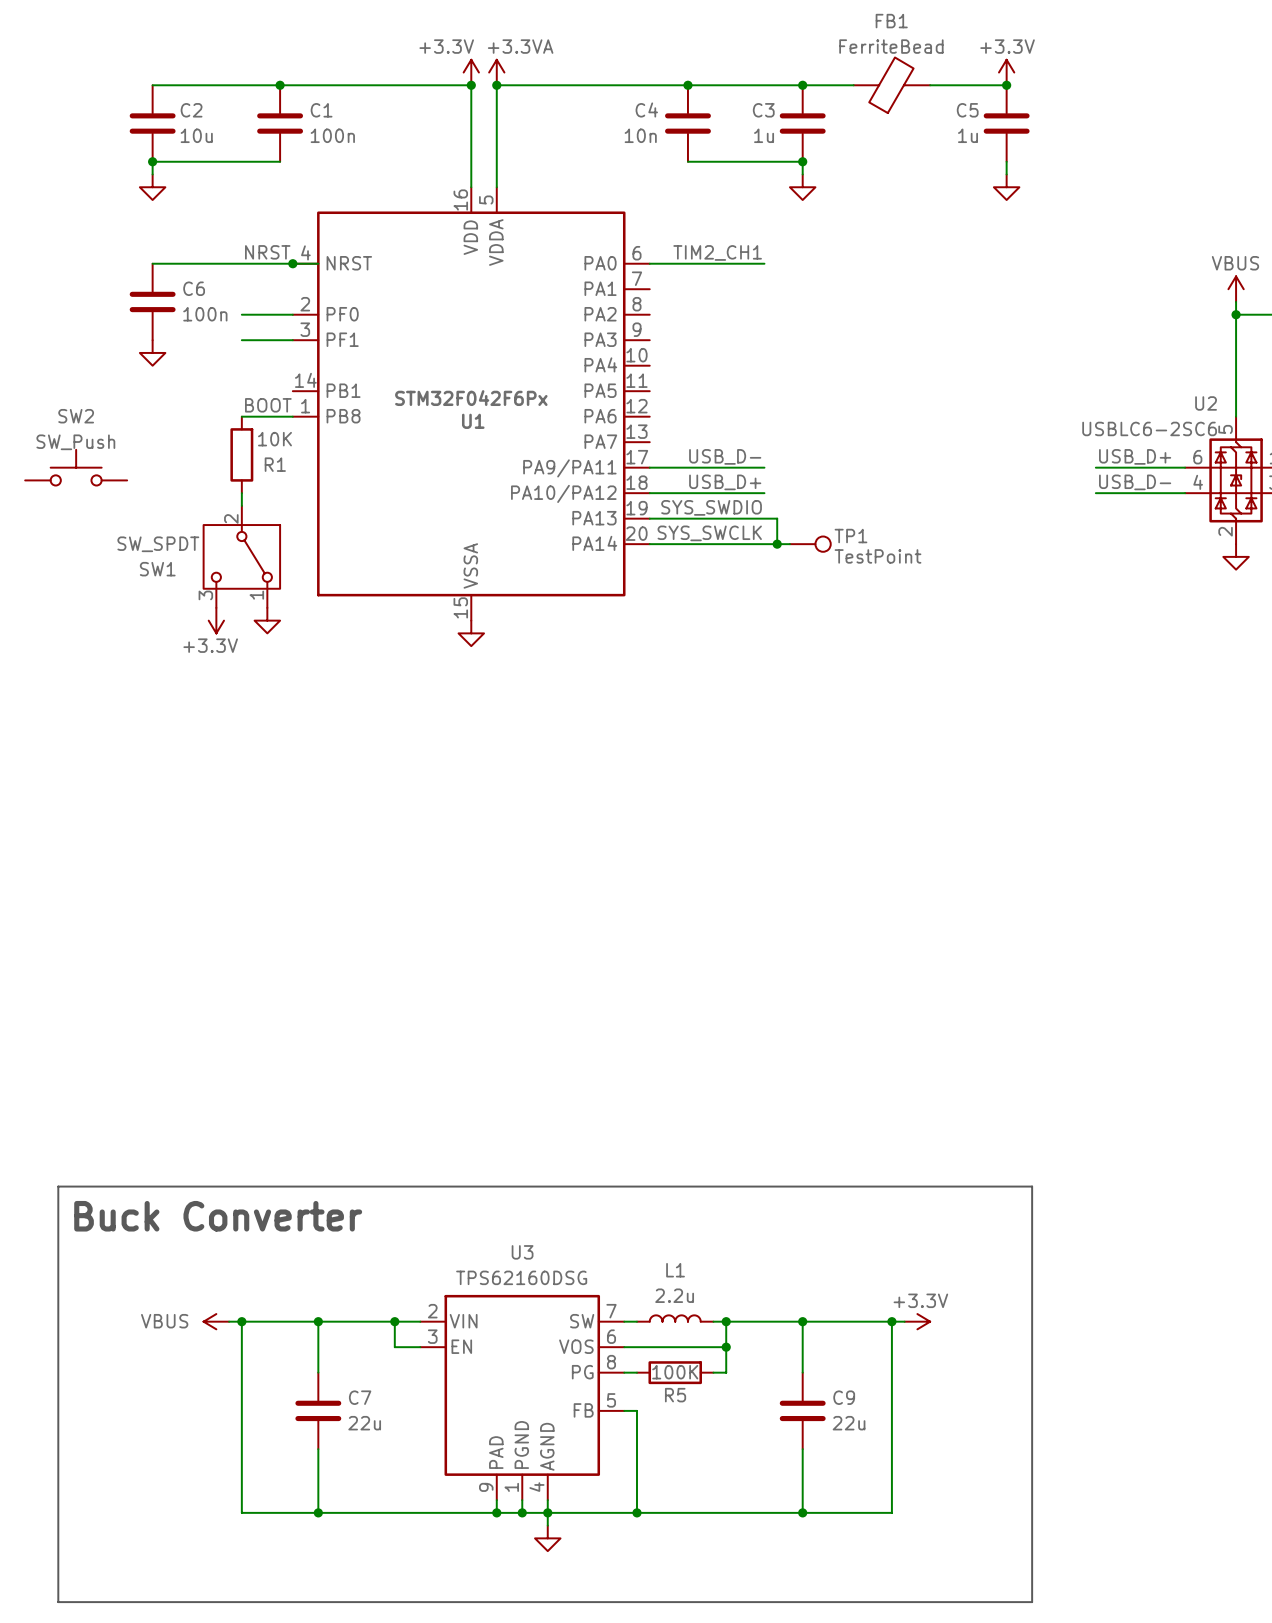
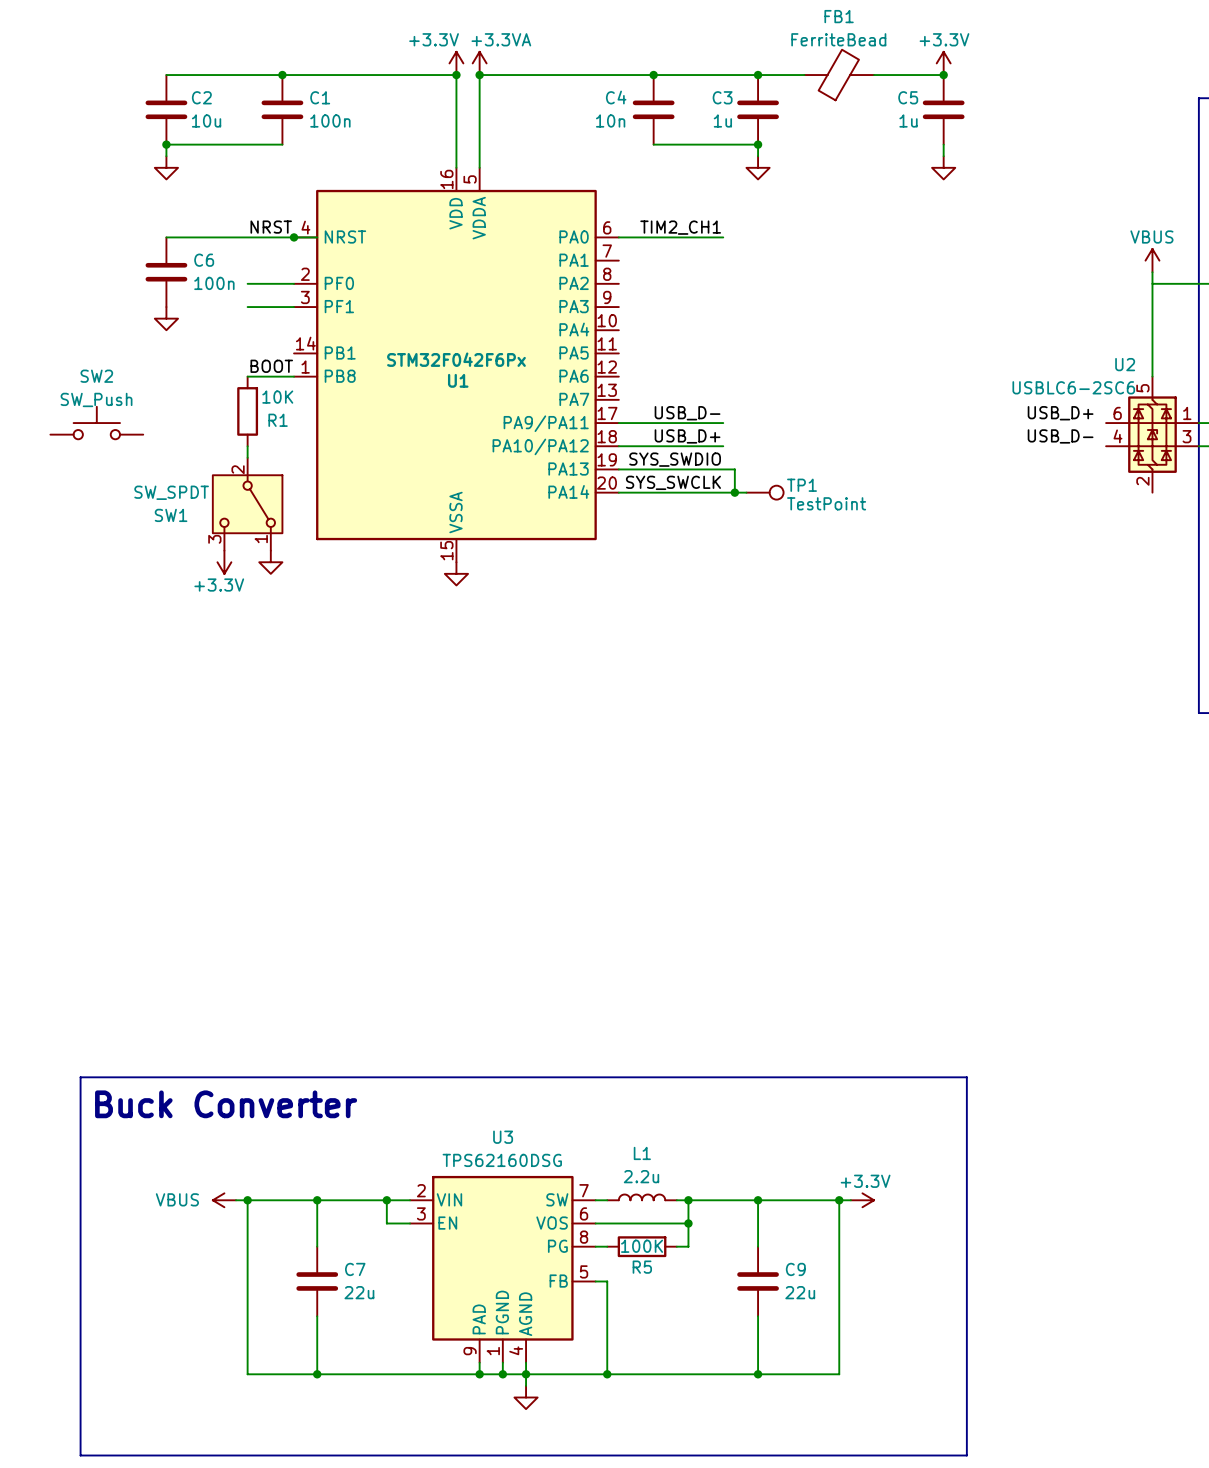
junction: (1236, 314) -> none
wire: (1095, 467) (1185, 467) -> none
wire: (1095, 493) (1185, 493) -> none
power symbol: (1236, 556) -> none

